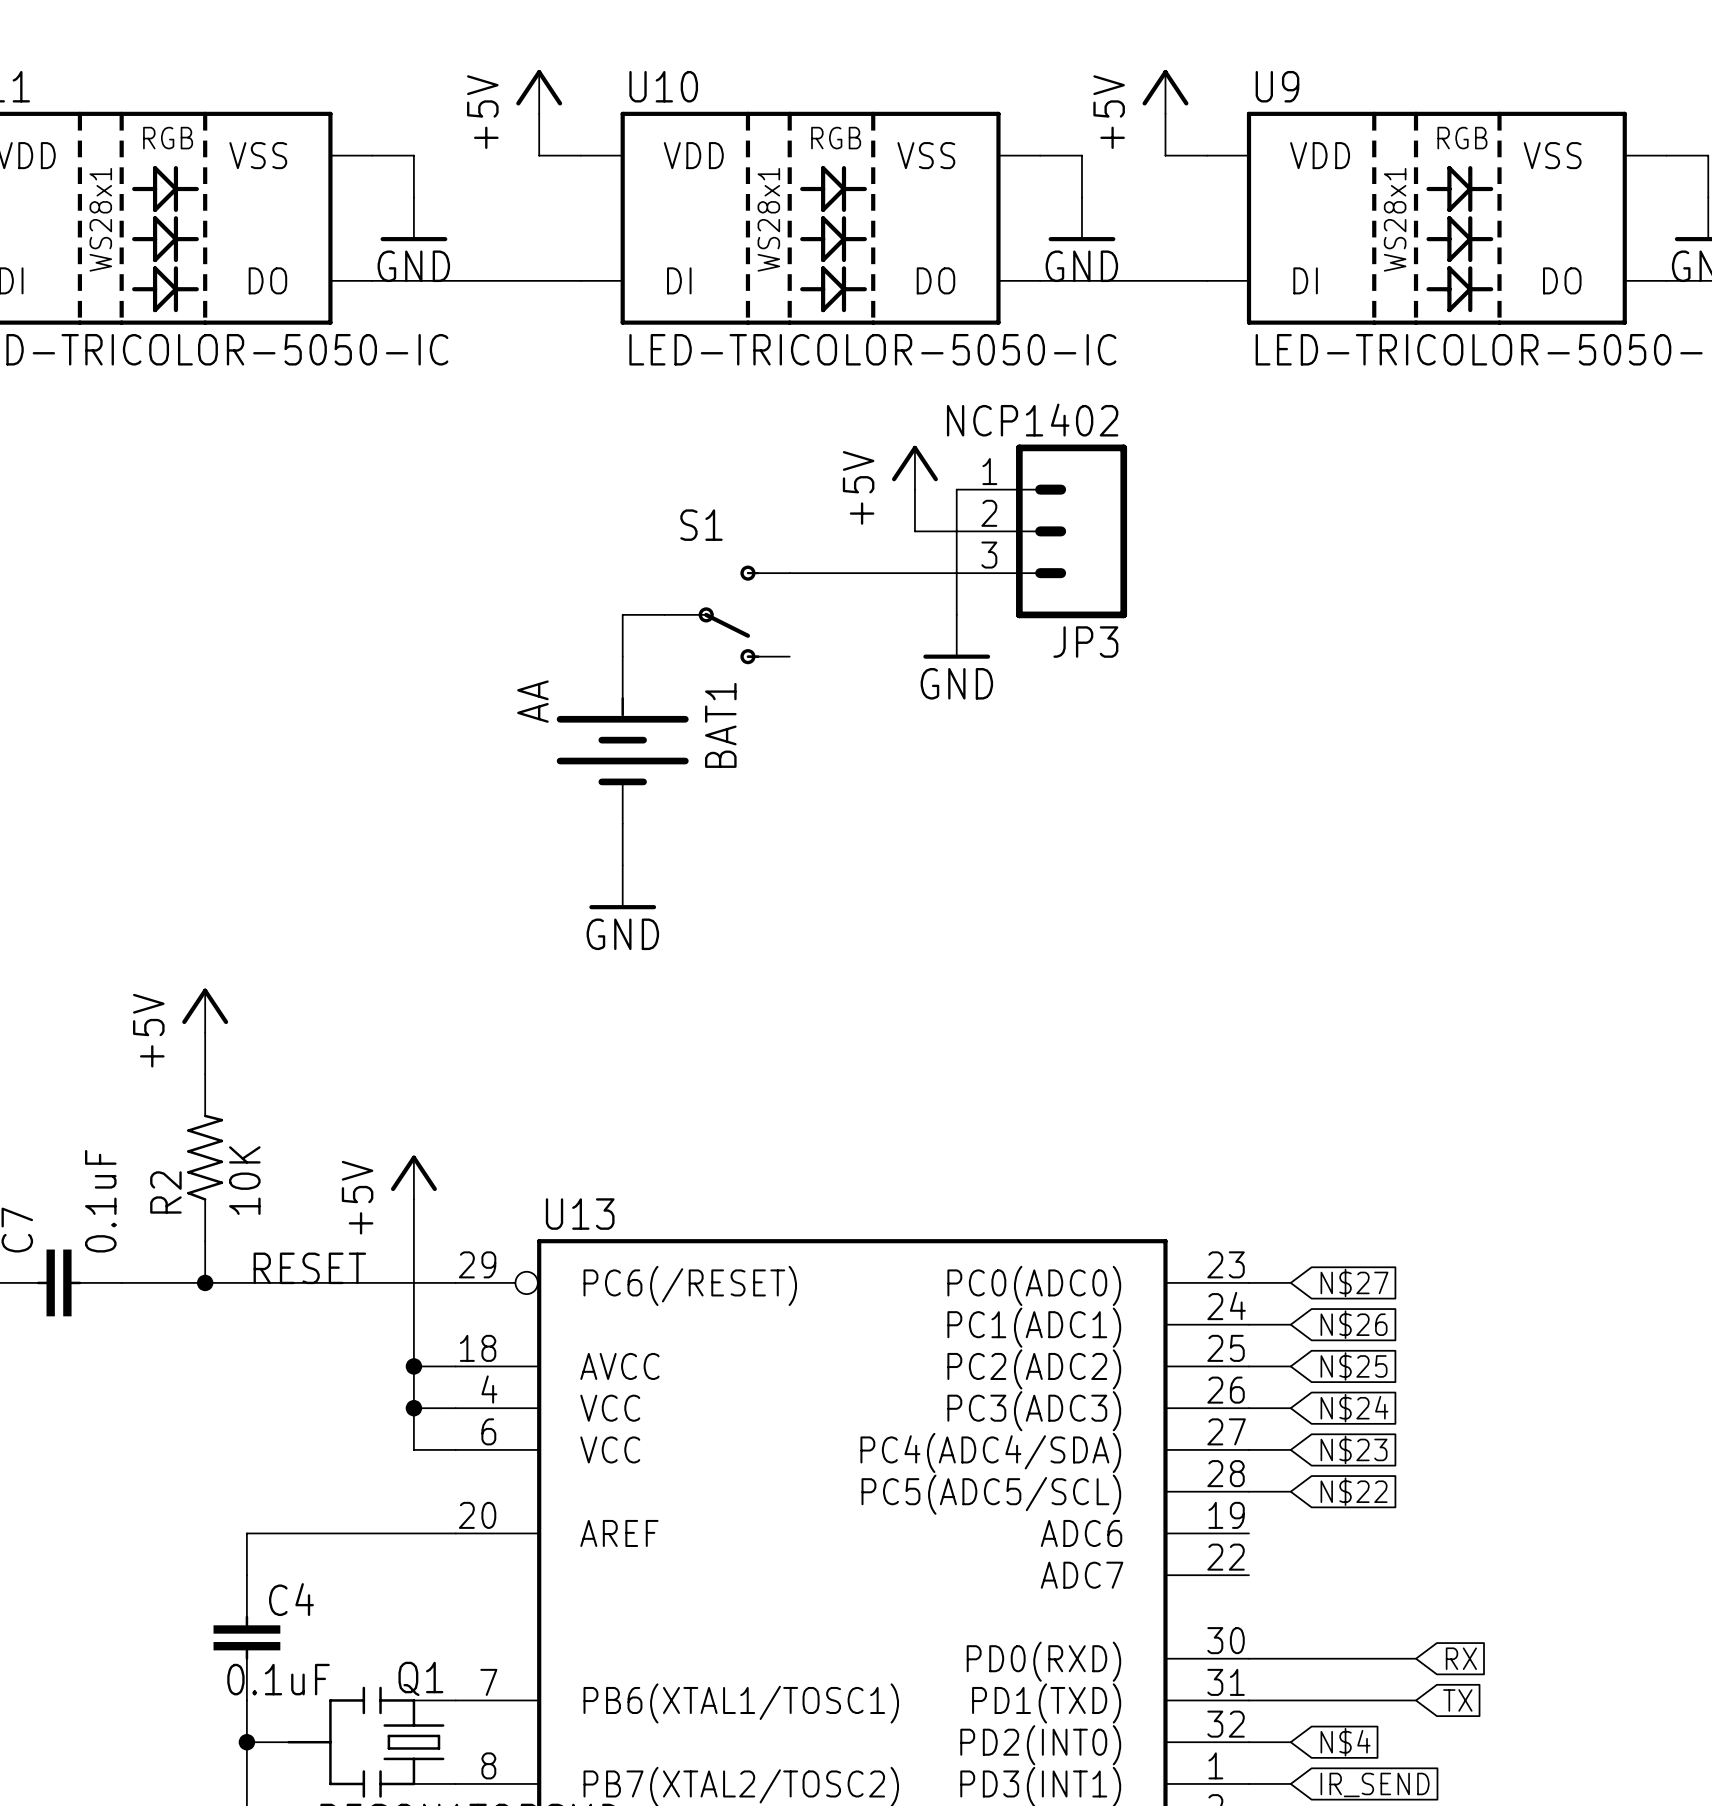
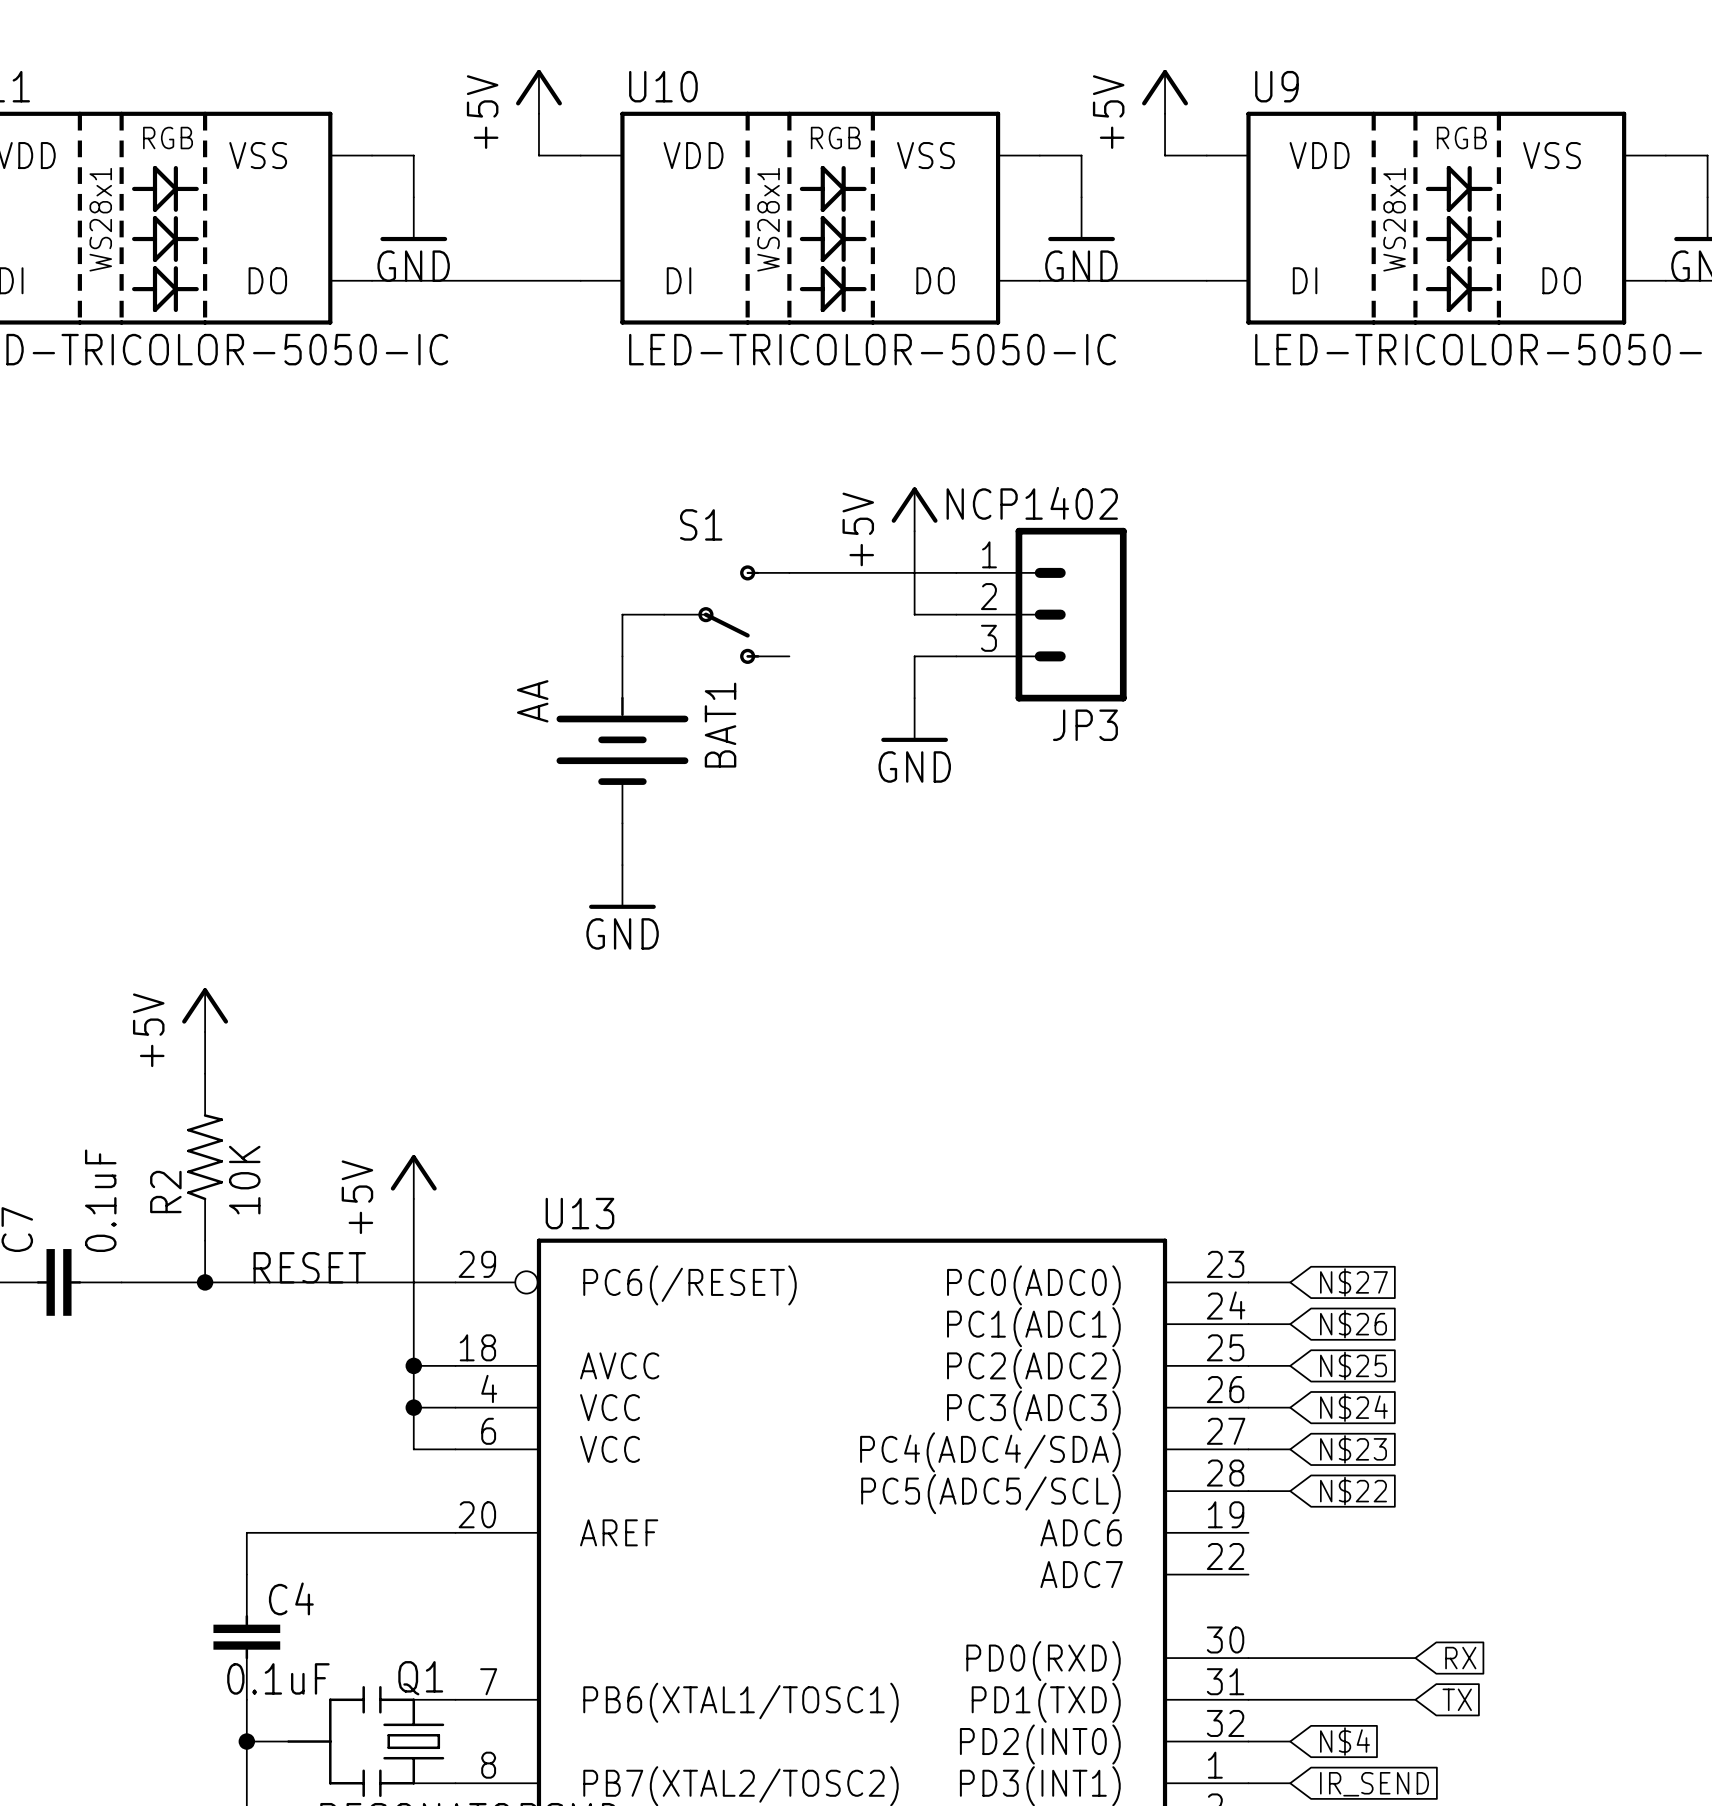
power symbol position: +5V (914, 467) -> +5V (914, 509)
wire: (914, 489) (914, 531) (956, 531) -> none
wire: (956, 489) (956, 614) -> (914, 531) (914, 614) (956, 614)
JP3 position: (1041, 531) -> (1041, 614)
power symbol position: GND (956, 636) -> GND (914, 720)
wire: none -> (956, 656) (914, 656) (914, 698)

